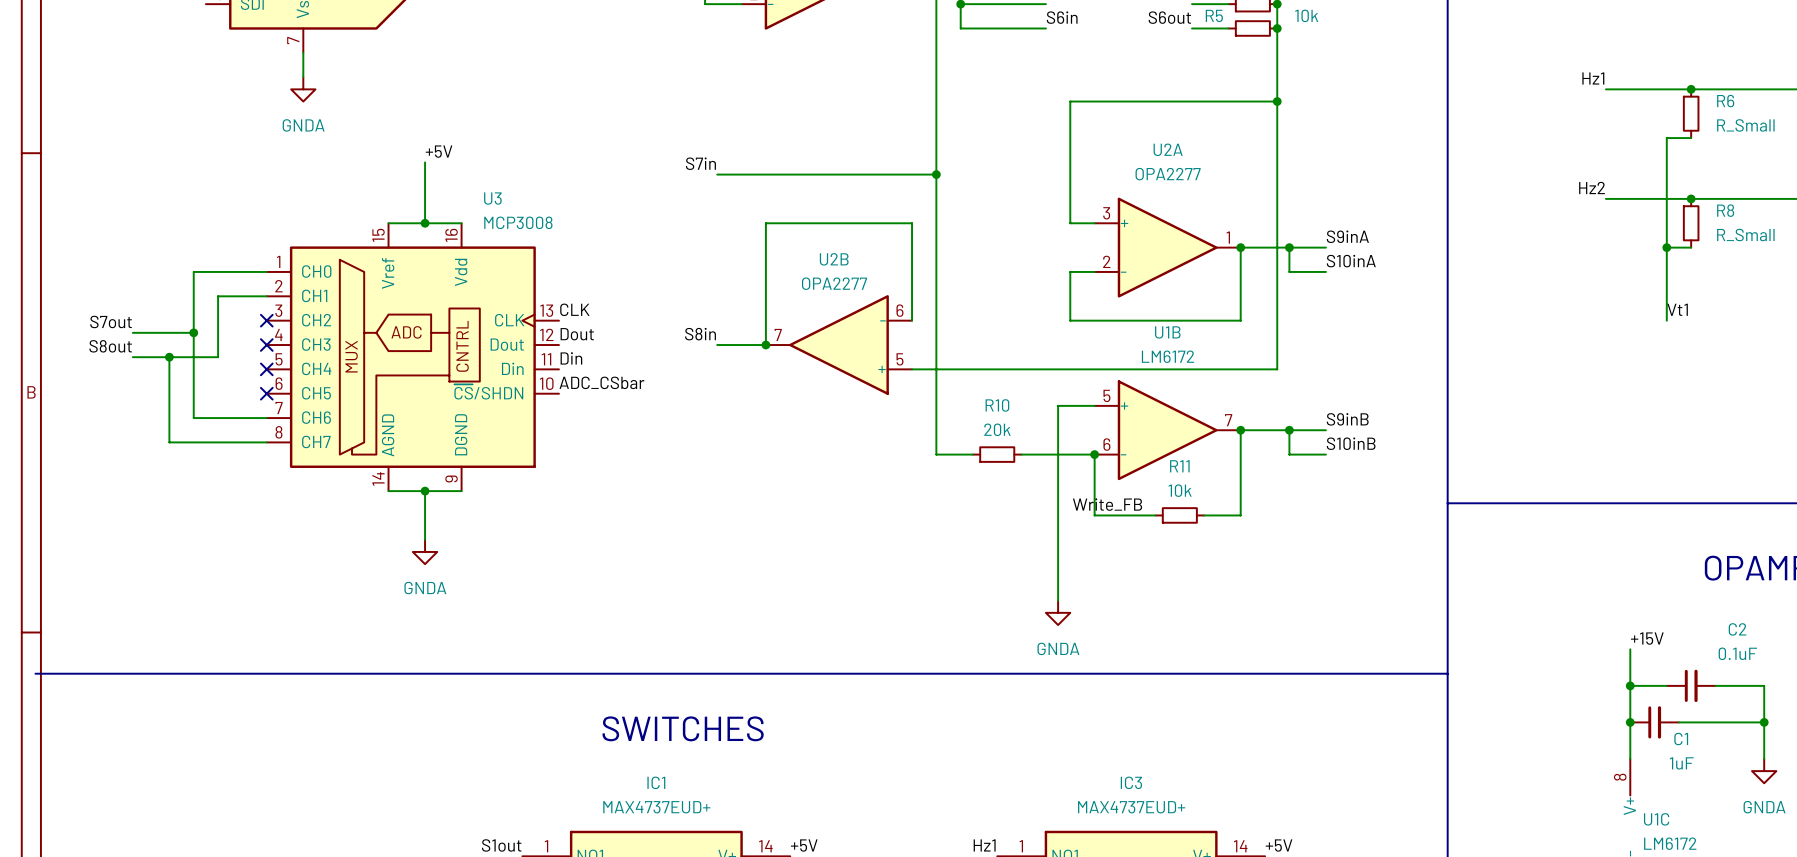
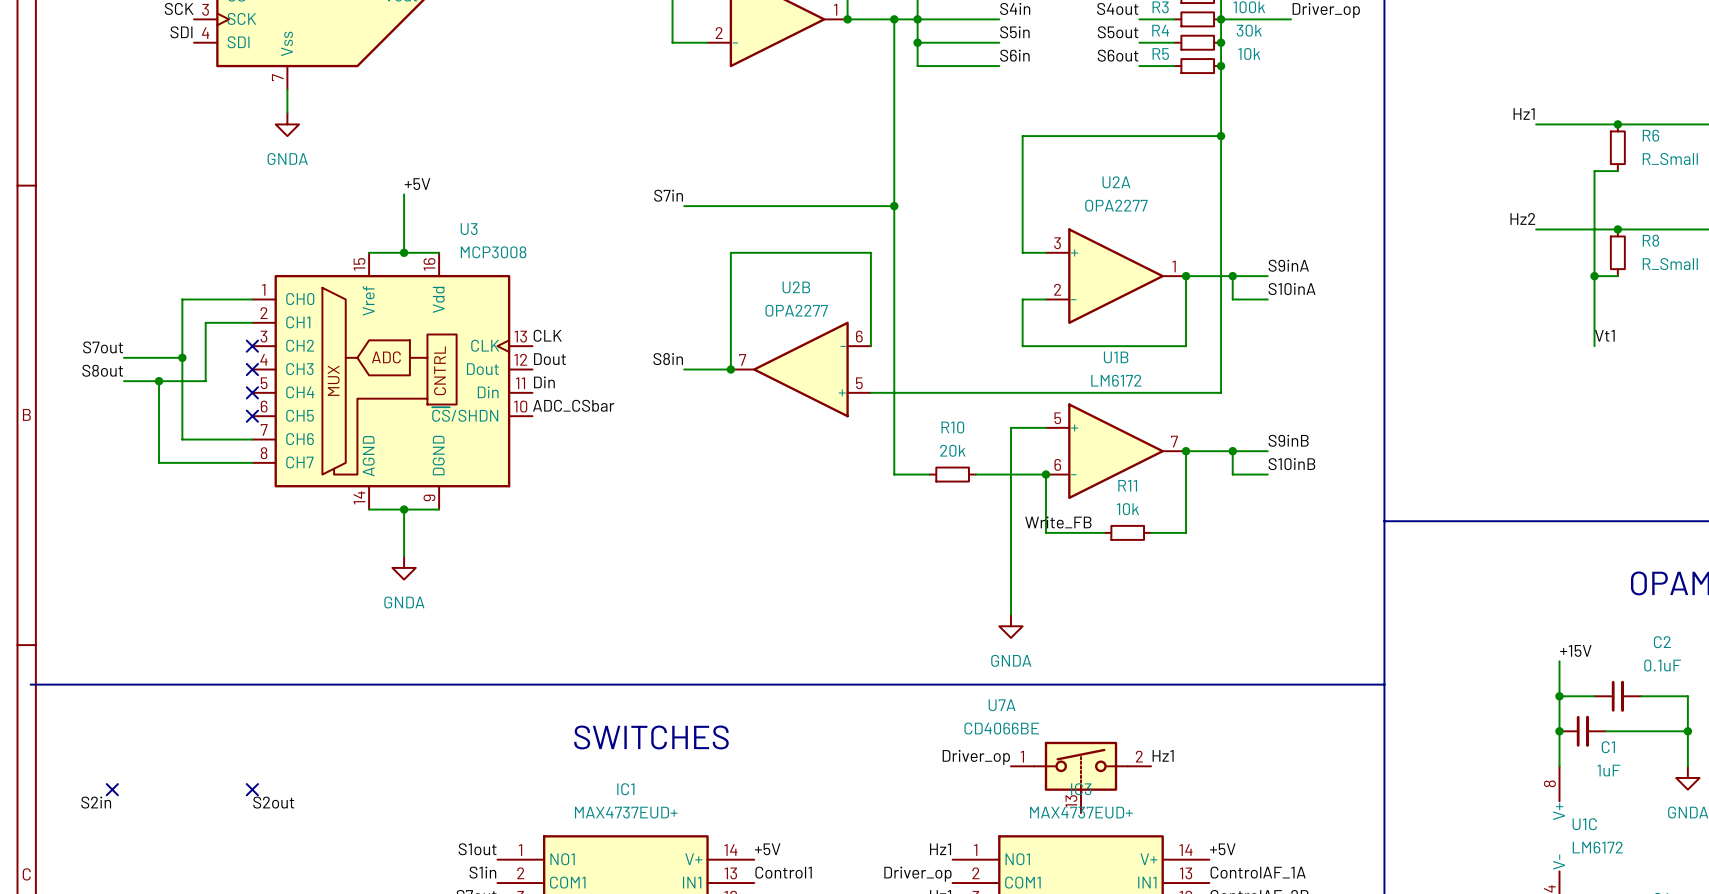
label: none -> Hz1 (1163, 755)
label: none -> Driver_op (976, 757)
U7A: none -> CD4066BE (1081, 777)
no-connect mark: none -> (112, 789)
no-connect mark: none -> (252, 789)
label: none -> S2in (96, 802)
label: none -> S2out (273, 802)

